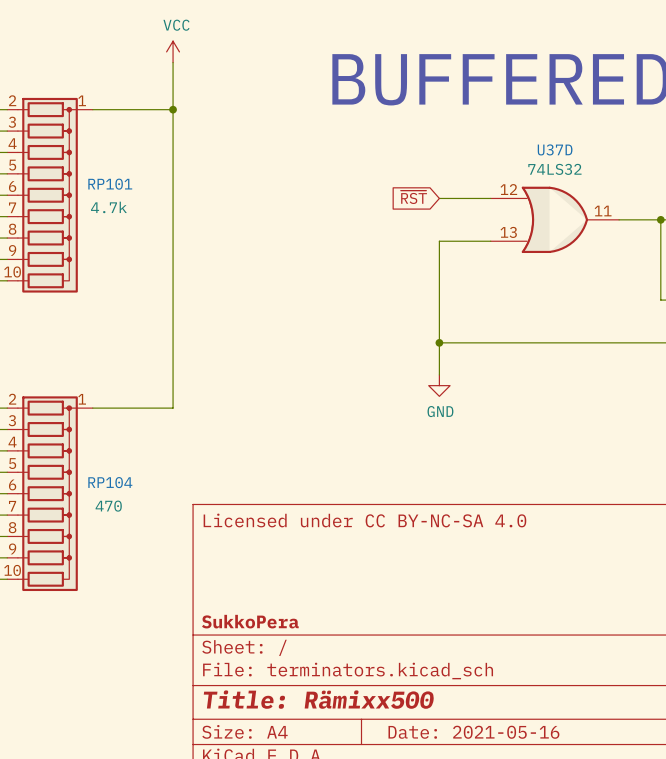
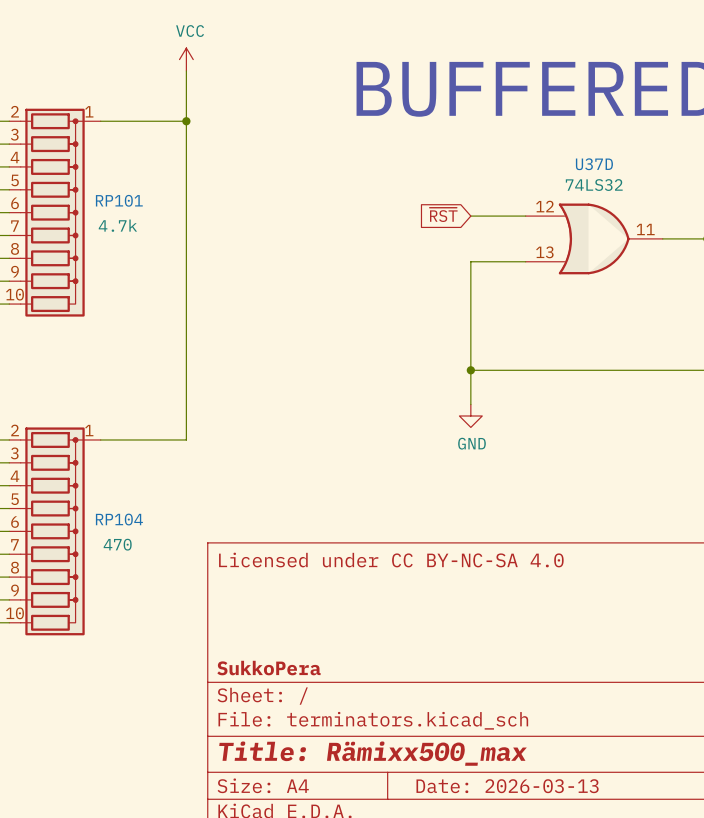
title block: Title: Rämixx500 (318, 699) -> Title: Rämixx500_max (373, 753)
title block: Date: 2021-05-16 (473, 732) -> Date: 2026-03-13 (507, 786)

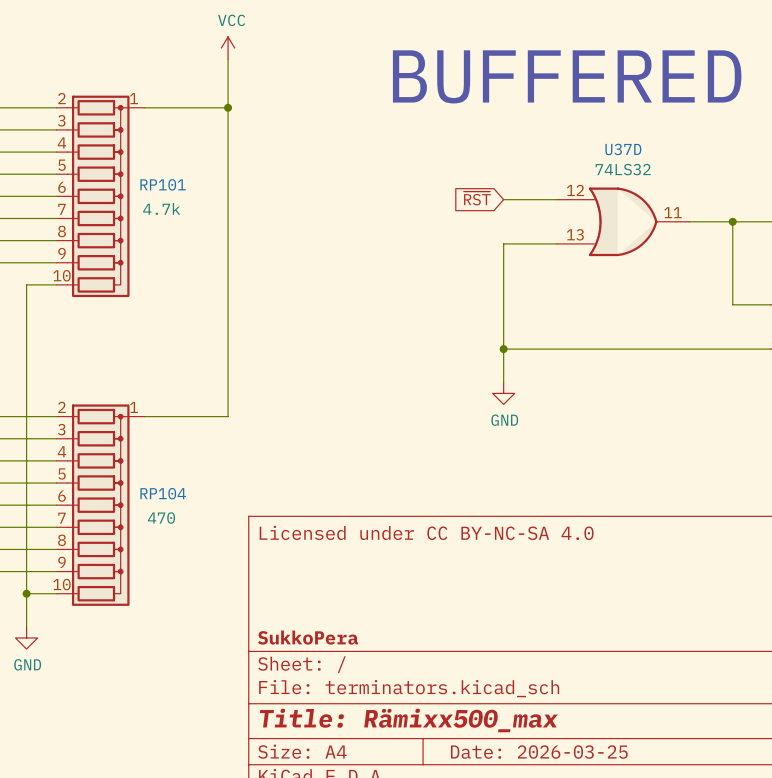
title block: Date: 2026-03-13 (507, 786) -> Date: 2026-03-25 (539, 752)

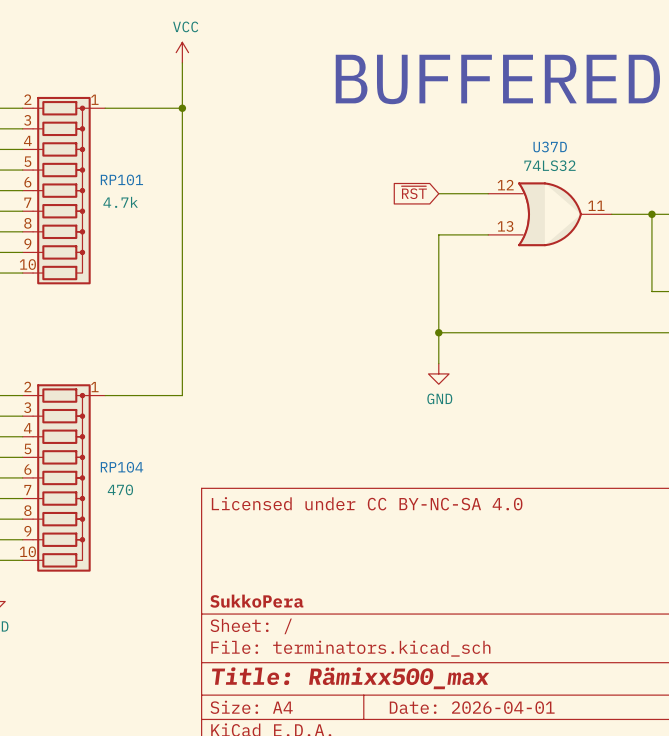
title block: Date: 2026-03-25 (539, 752) -> Date: 2026-04-01 (472, 707)

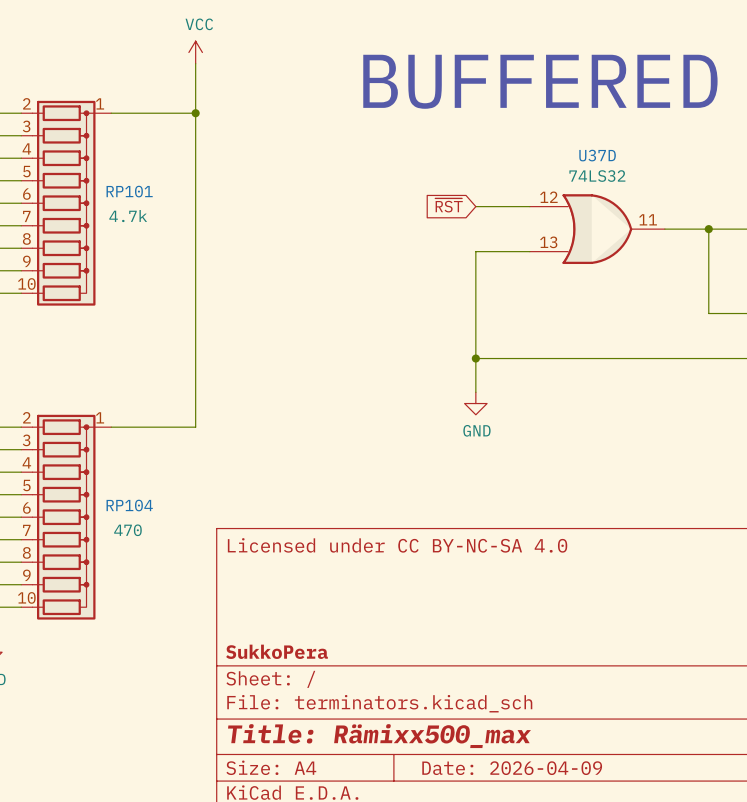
title block: Date: 2026-04-01 (472, 707) -> Date: 2026-04-09 (512, 768)

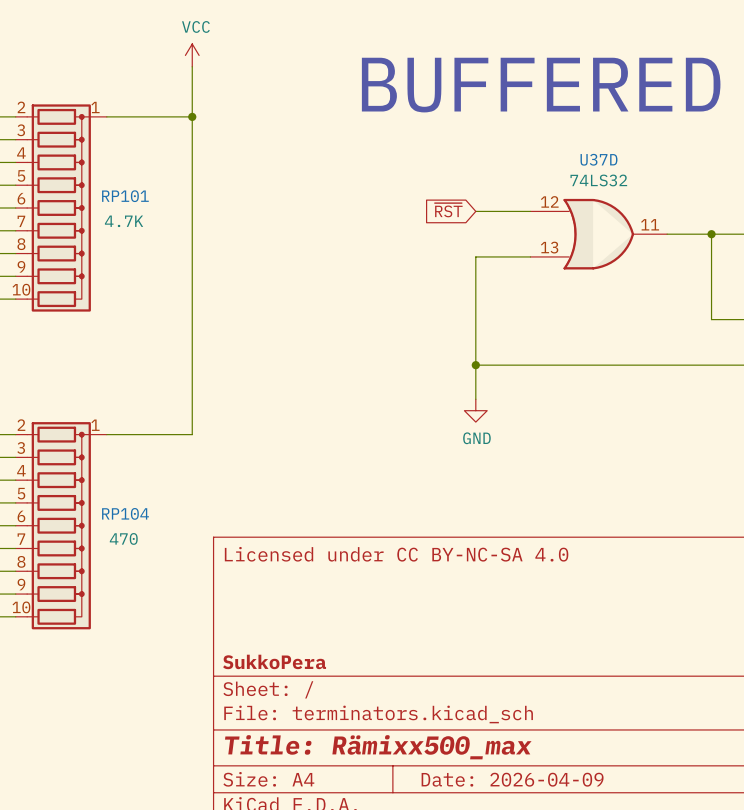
RP101 value: 4.7k (128, 216) -> 4.7K (124, 221)

